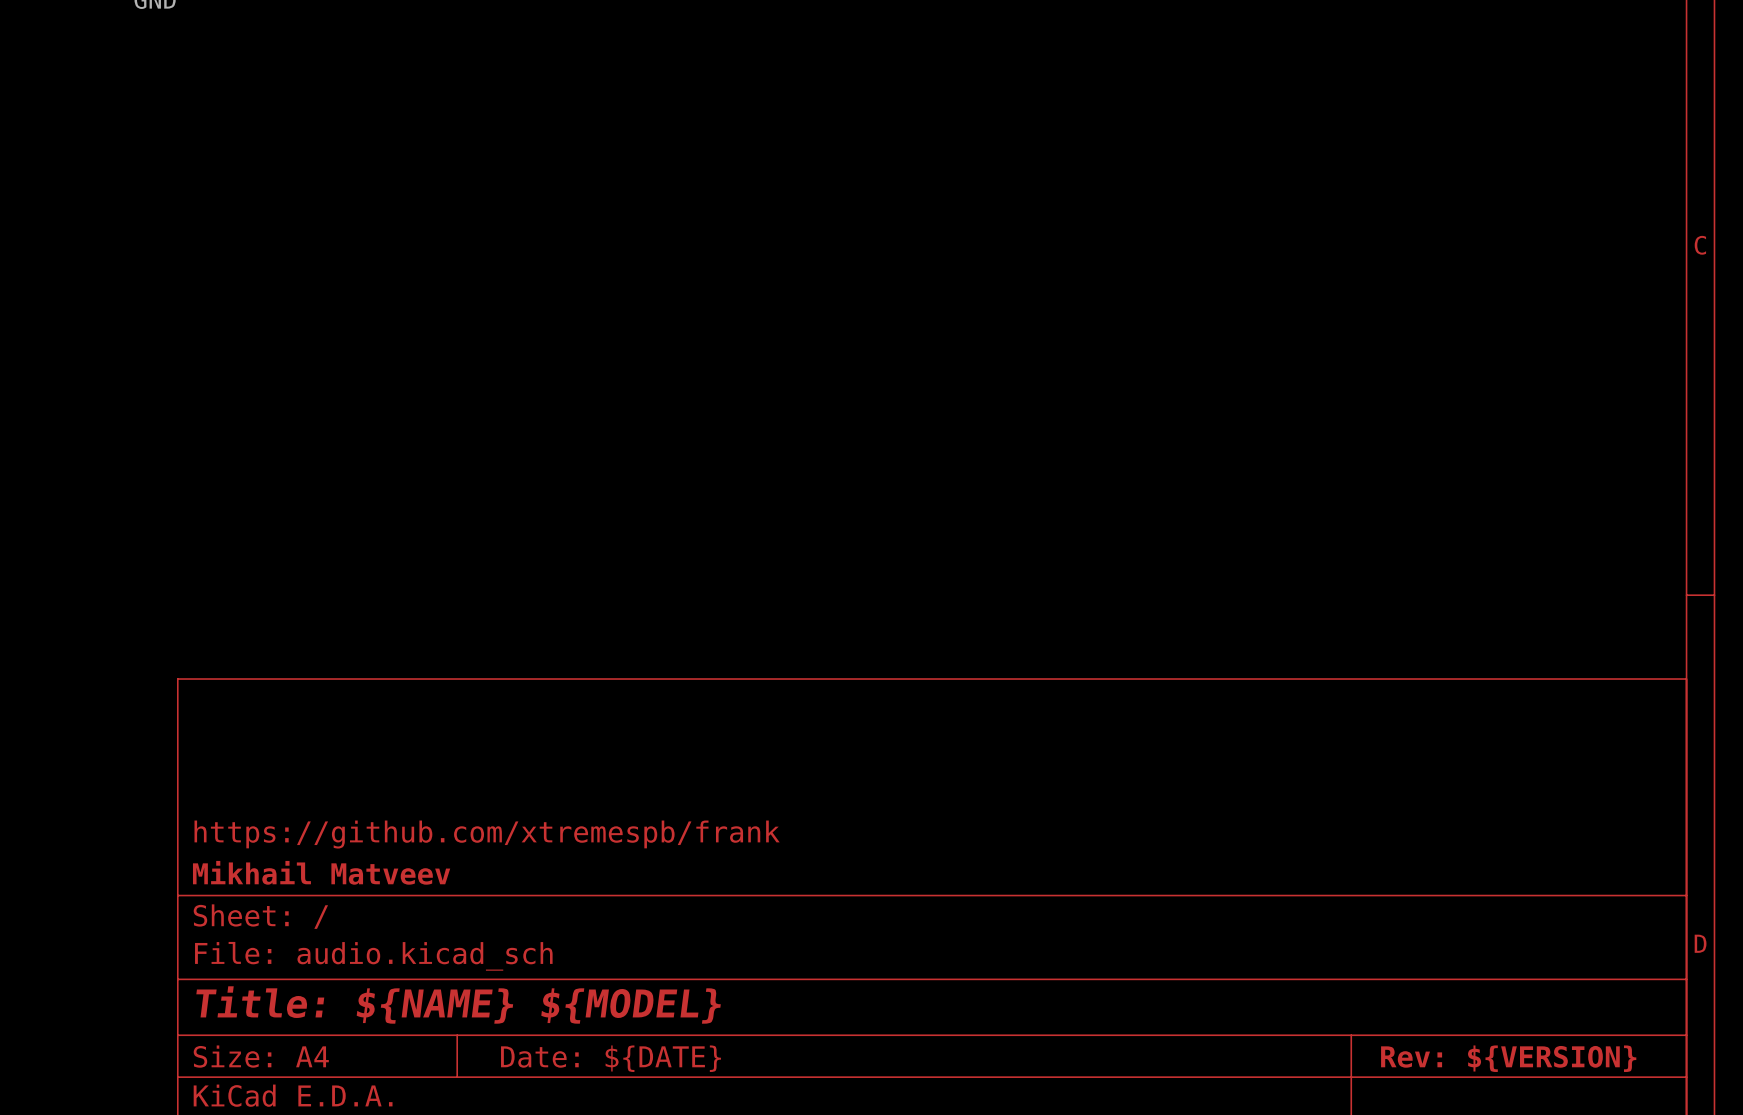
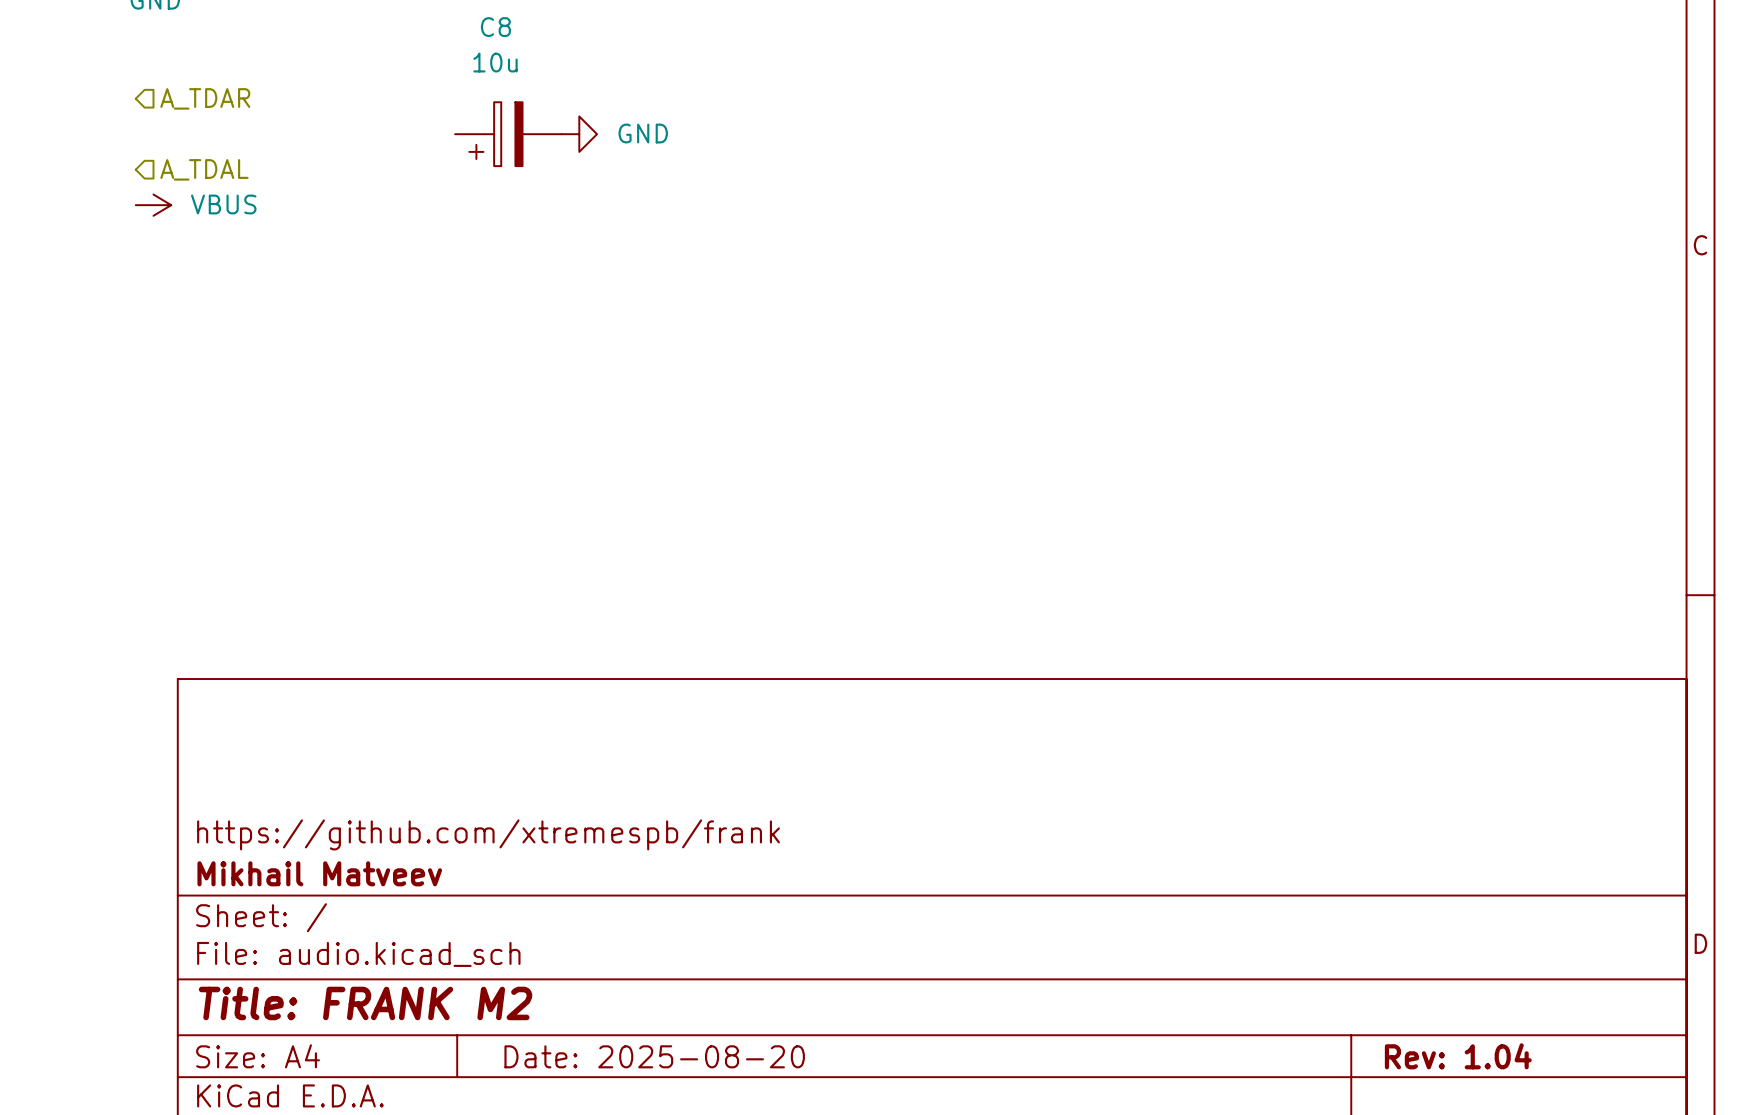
hierarchical label: none -> A_TDAR (205, 98)
C8: none -> 10u (508, 134)
power symbol: none -> GND (579, 134)
hierarchical label: none -> A_TDAL (204, 169)
power symbol: none -> VBUS (153, 205)
title block: Title: ${NAME} ${MODEL} (458, 1004) -> Title: FRANK M2 (365, 1003)
title block: Date: ${DATE} (610, 1058) -> Date: 2025-08-20 (654, 1056)
title block: Rev: ${VERSION} (1508, 1058) -> Rev: 1.04 (1458, 1056)

